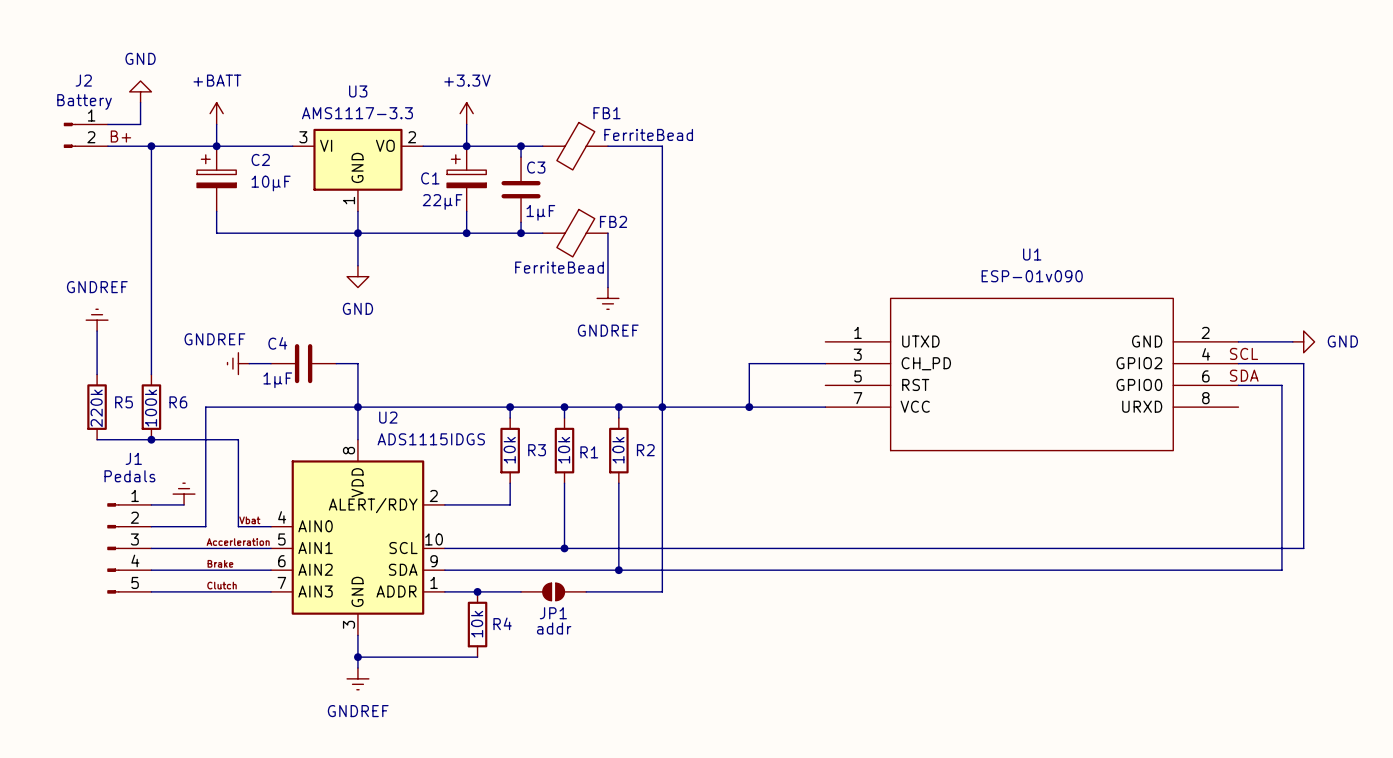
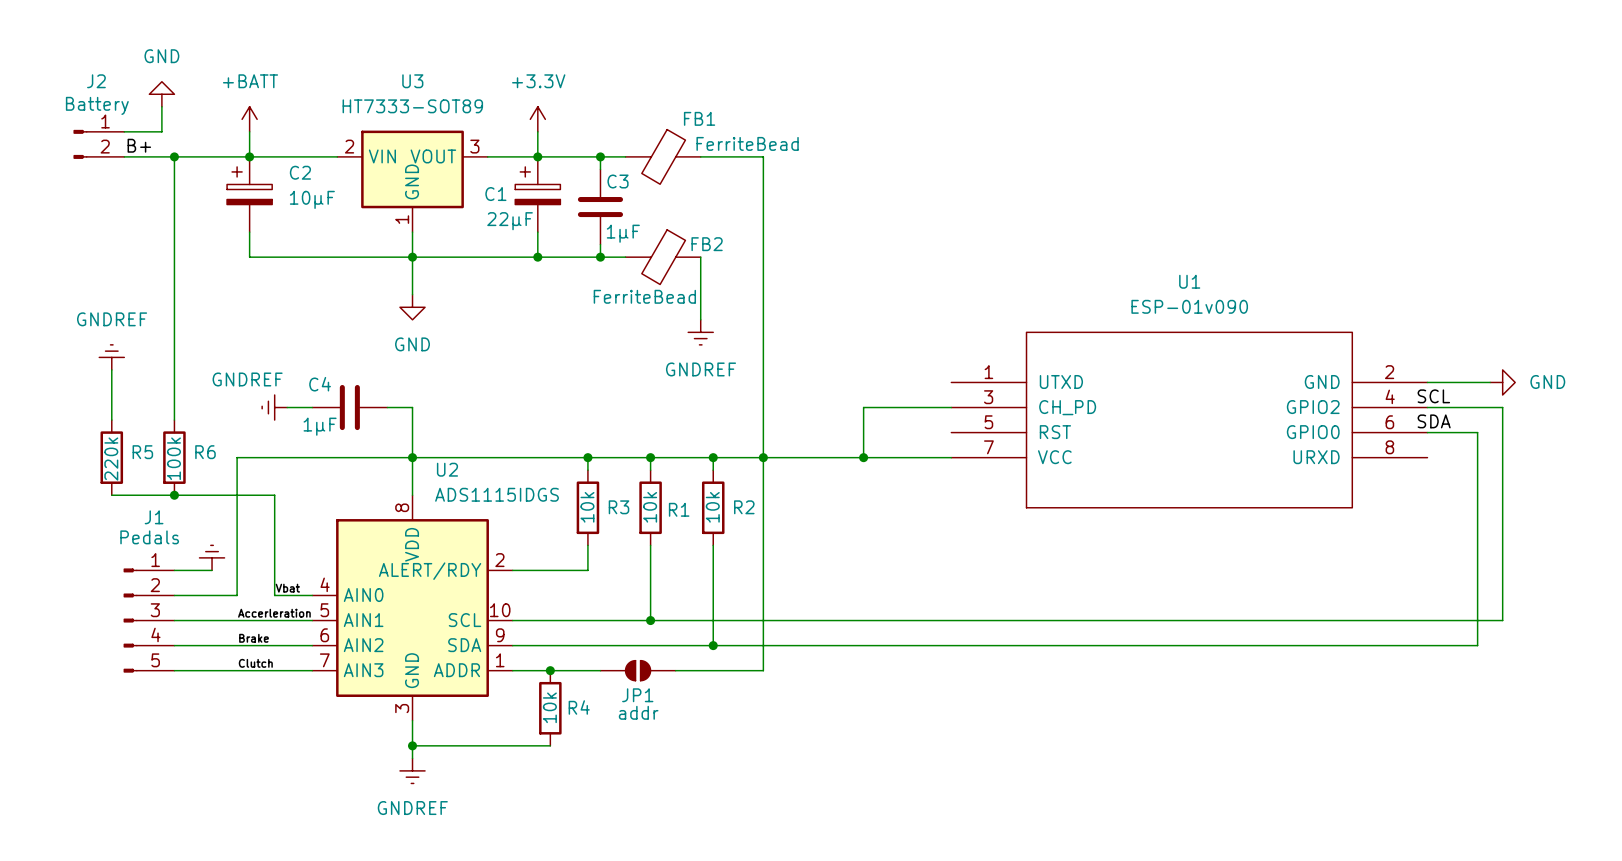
U3 value: AMS1117-3.3 (357, 113) -> HT7333-SOT89 (412, 106)
U3 symbol: [292, 128, 424, 212] -> [337, 130, 488, 233]

